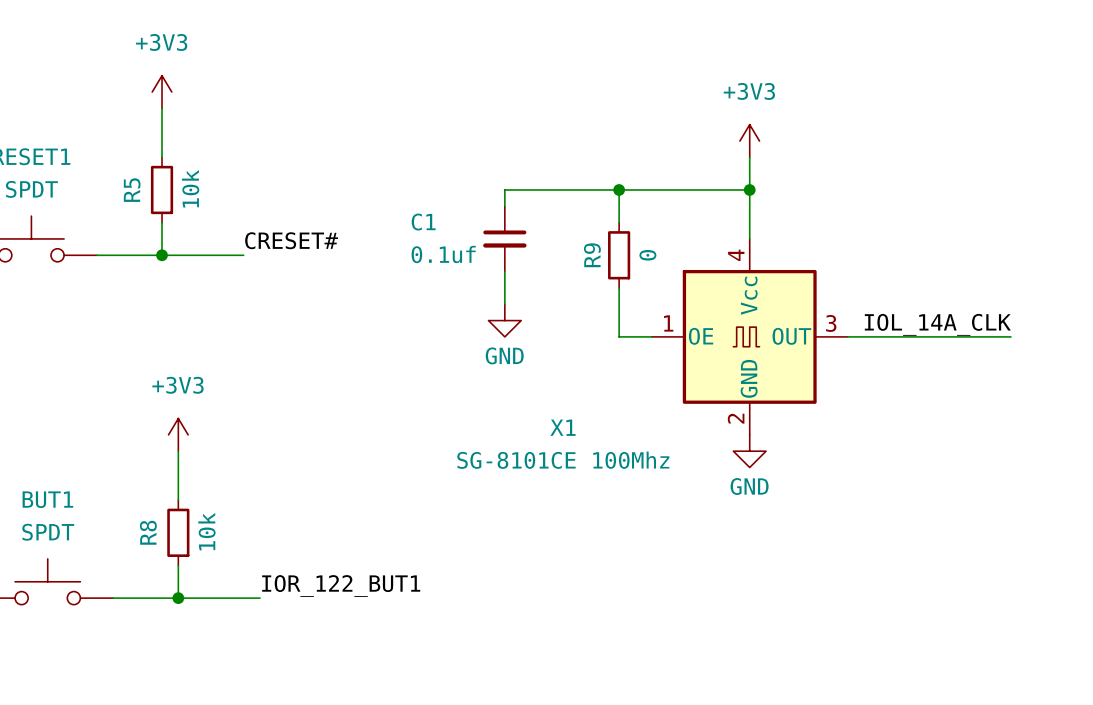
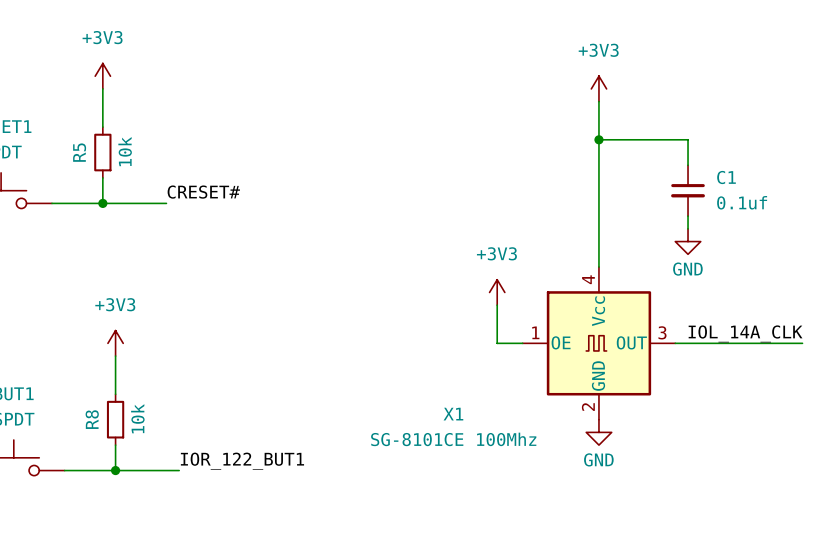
wire: none -> (598, 101) (598, 267)
power symbol position: +3V3 (749, 141) -> +3V3 (598, 88)
wire: (749, 157) (749, 238) -> none
wire: none -> (598, 139) (688, 139) (688, 165)
wire: (619, 189) (619, 222) -> none
junction: (619, 189) -> none
wire: (749, 189) (504, 189) (504, 206) -> none
junction position: (749, 189) -> (598, 139)
C1 name position: C1 (423, 222) -> C1 (726, 177)
C1 position: (504, 238) -> (688, 190)
C1 value position: 0.1uf (443, 254) -> 0.1uf (742, 202)
R9: 0 (619, 255) -> none
wire: (504, 271) (504, 304) -> none
wire: none -> (688, 216) (688, 228)
wire: (619, 287) (619, 336) (651, 336) -> (497, 305) (497, 343) (522, 343)
power symbol: none -> GND (688, 241)
power symbol: GND (504, 320) -> none
label position: IOL_14A_CLK (937, 324) -> IOL_14A_CLK (745, 333)
X1 position: (749, 336) -> (598, 343)
wire: (847, 336) (1010, 336) -> (675, 343) (802, 343)
power symbol: none -> +3V3 (497, 292)
power symbol position: GND (749, 451) -> GND (598, 432)

